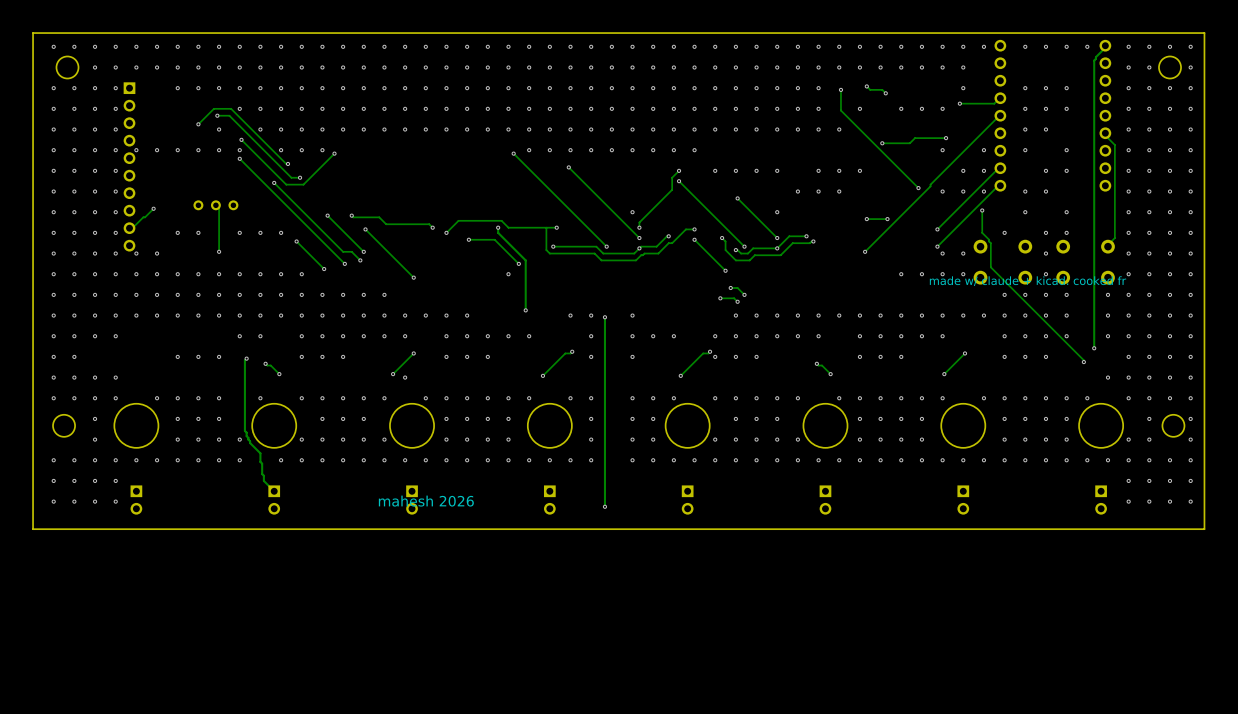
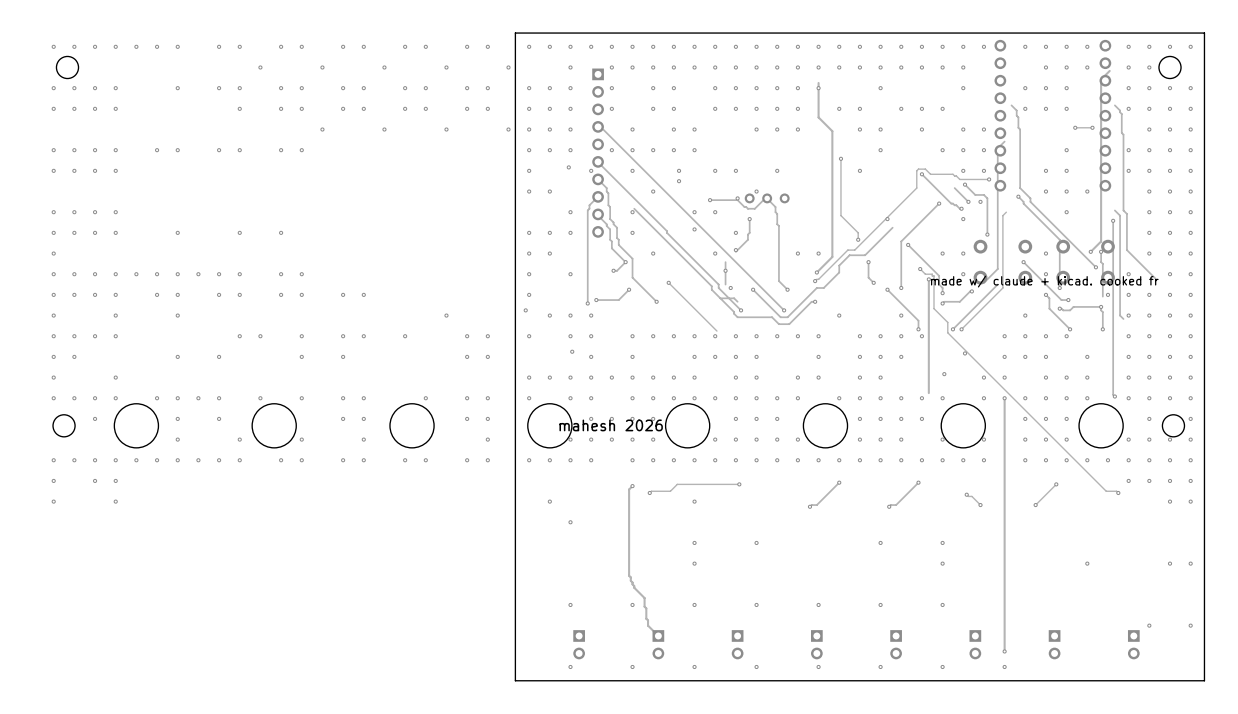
board edge: (515, 33) (33, 33) (33, 529) (1204, 529) -> (515, 33) (515, 680) (1204, 680) (1204, 529)
via: (198, 46) -> none
via: (260, 46) -> none
via: (322, 46) -> none
via: (384, 46) -> none
via: (446, 46) -> none
via: (508, 46) -> none
track: (1102, 50) (1094, 60) (1094, 348) -> none
via: (95, 67) -> none
via: (115, 67) -> none
via: (136, 67) -> none
via: (157, 67) -> none
via: (177, 67) -> none
via: (198, 67) -> none
via: (219, 67) -> none
via: (239, 67) -> none
via: (281, 67) -> none
via: (301, 67) -> none
via: (343, 67) -> none
via: (363, 67) -> none
via: (405, 67) -> none
via: (425, 67) -> none
via: (467, 67) -> none
via: (487, 67) -> none
via: (529, 67) -> none
via: (549, 67) -> none
via: (591, 67) -> none
via: none -> (1045, 67)
via: none -> (1066, 67)
via: none -> (1087, 67)
via: (1190, 67) -> none
track: none -> (1109, 70) (1101, 81) (1101, 241) (1090, 251)
track: none -> (818, 82) (818, 117) (832, 131) (832, 256) (816, 272)
track: (866, 86) (870, 89) (882, 89) (885, 93) -> none
via: (866, 86) -> none
via: (198, 88) -> none
via: (260, 88) -> none
via: (322, 88) -> none
via: (384, 88) -> none
via: (446, 88) -> none
via: (508, 88) -> none
via: (591, 88) -> none
via: (632, 88) -> none
via: (694, 88) -> none
via: none -> (880, 88)
track: (840, 89) (840, 110) (918, 188) -> none
via: (840, 89) -> none
via: (885, 93) -> none
track: (996, 101) (994, 103) (959, 103) -> none
via: (959, 103) -> none
track: none -> (1011, 105) (1016, 110) (1020, 129) (1020, 188) (1030, 198) (1030, 201) (1095, 267)
track: none -> (1114, 105) (1121, 114) (1123, 210) (1126, 213) (1126, 250) (1156, 279)
via: (260, 108) -> none
via: (322, 108) -> none
via: (384, 108) -> none
via: (446, 108) -> none
via: (508, 108) -> none
via: (591, 108) -> none
via: (632, 108) -> none
via: (694, 108) -> none
via: (818, 108) -> none
via: none -> (839, 108)
track: (217, 115) (229, 115) (291, 177) (300, 177) -> none
via: (217, 115) -> none
track: (996, 119) (865, 251) -> none
track: (198, 124) (213, 108) (231, 108) (287, 163) -> none
via: (198, 124) -> none
via: none -> (1075, 127)
track: none -> (1092, 127) (1075, 127)
via: none -> (1092, 127)
via: (53, 129) -> none
via: (74, 129) -> none
via: (95, 129) -> none
via: (115, 129) -> none
via: (219, 129) -> none
via: (260, 129) -> none
via: (281, 129) -> none
via: (301, 129) -> none
via: (343, 129) -> none
via: (363, 129) -> none
via: (405, 129) -> none
via: (425, 129) -> none
via: (467, 129) -> none
via: (487, 129) -> none
via: (591, 129) -> none
track: none -> (603, 129) (784, 310)
via: (611, 129) -> none
via: (653, 129) -> none
via: (715, 129) -> none
via: (735, 129) -> none
via: (818, 129) -> none
via: (839, 129) -> none
via: none -> (859, 129)
via: none -> (880, 129)
via: none -> (921, 129)
via: none -> (963, 129)
via: none -> (983, 129)
via: (1025, 129) -> none
via: (1045, 129) -> none
via: (1128, 129) -> none
track: (946, 138) (915, 138) (909, 143) (882, 143) -> none
via: (946, 138) -> none
track: (1107, 138) (1114, 145) (1114, 238) (1111, 241) -> none
track: (241, 139) (286, 184) (303, 184) (334, 153) -> none
via: (241, 139) -> none
track: none -> (1004, 141) (997, 148) (997, 269) (983, 282)
via: (882, 143) -> none
via: (136, 150) -> none
via: (198, 150) -> none
via: (322, 150) -> none
via: (591, 150) -> none
via: none -> (880, 150)
via: none -> (963, 150)
via: (1025, 150) -> none
via: (334, 153) -> none
track: (513, 153) (606, 246) -> none
via: (513, 153) -> none
part: none -> (598, 153)
track: (239, 158) (344, 263) -> none
via: (239, 158) -> none
track: none -> (840, 158) (840, 215) (858, 232) (858, 239)
via: (287, 163) -> none
track: none -> (601, 165) (718, 284) (718, 287) (741, 310)
part: (129, 166) -> none
track: (568, 167) (639, 238) -> none
via: none -> (529, 170)
via: none -> (591, 170)
via: none -> (632, 170)
track: (679, 170) (672, 177) (672, 189) (639, 222) (639, 227) -> none
via: (756, 170) -> none
via: (818, 170) -> none
via position: (839, 170) -> (840, 158)
track: (996, 170) (937, 229) -> none
track: none -> (921, 174) (951, 203) (961, 208)
via: none -> (921, 174)
via: (300, 177) -> none
track: none -> (989, 179) (959, 179) (952, 174) (930, 174) (925, 169) (918, 169) (916, 170) (916, 188) (854, 250) (847, 250) (815, 281)
via: none -> (989, 179)
track: (679, 181) (744, 246) -> none
track: (274, 182) (343, 251) (351, 251) (360, 260) -> none
via: (274, 182) -> none
track: none -> (601, 182) (608, 193) (610, 219) (617, 227) (618, 244) (632, 258) (632, 277) (656, 301)
track: none -> (965, 184) (975, 194) (983, 194) (987, 198) (987, 234)
via: none -> (965, 184)
via: (918, 188) -> none
track: none -> (954, 188) (968, 201)
track: (996, 188) (937, 246) -> none
via: (53, 191) -> none
via: (74, 191) -> none
via: (95, 191) -> none
via: (115, 191) -> none
via: none -> (529, 191)
via: none -> (549, 191)
via: none -> (653, 191)
via: none -> (756, 191)
via: (797, 191) -> none
via: (818, 191) -> none
via: (839, 191) -> none
via: (942, 191) -> none
via: (963, 191) -> none
via: (983, 191) -> none
via: (1025, 191) -> none
via: none -> (1066, 191)
via: none -> (1087, 191)
via: (1128, 191) -> none
track: none -> (1018, 196) (1059, 239) (1059, 287)
via: none -> (1018, 196)
track: (737, 198) (746, 207) -> (710, 200) (737, 200) (746, 207)
part: none -> (767, 198)
track: none -> (594, 200) (587, 210) (587, 303)
via: none -> (710, 200)
track: none -> (770, 201) (775, 207) (778, 225) (778, 281) (787, 289)
via: none -> (968, 201)
via: none -> (980, 201)
track: none -> (939, 203) (901, 241) (901, 287)
via: none -> (939, 203)
part: (215, 205) -> none
track: (153, 208) (134, 225) -> none
via: (153, 208) -> none
track: (219, 208) (219, 251) -> none
track: none -> (634, 208) (711, 286) (711, 289) (737, 317) (772, 317) (778, 324) (789, 324) (811, 301) (815, 301)
track: (747, 208) (777, 238) -> (747, 208) (754, 208) (763, 200)
via: none -> (961, 208)
track: (982, 210) (982, 232) (990, 243) (990, 267) (1083, 362) -> none
via: (982, 210) -> none
track: none -> (1114, 210) (1120, 215) (1120, 315) (1123, 319)
via: none -> (570, 212)
via: none -> (694, 212)
via: none -> (715, 212)
via: (777, 212) -> none
track: none -> (1006, 212) (1002, 215) (1002, 287) (961, 329)
via: (1025, 212) -> none
via: (1128, 212) -> none
track: (327, 215) (363, 251) -> none
via: (327, 215) -> none
track: (351, 215) (353, 217) (379, 217) (386, 224) (429, 224) (432, 227) -> none
via: (351, 215) -> none
track: none -> (601, 219) (610, 229) (611, 248) (625, 262) (617, 270) (613, 270)
track: none -> (749, 219) (747, 239) (735, 251)
via: none -> (749, 219)
via: (866, 219) -> none
track: (887, 219) (866, 219) -> none
via: none -> (963, 219)
track: none -> (1113, 220) (1113, 394) (1114, 396)
via: none -> (1113, 220)
via: (432, 227) -> none
track: (498, 227) (498, 232) (525, 260) (525, 310) -> none
via: (498, 227) -> none
track: (546, 227) (546, 250) (549, 253) (594, 253) (601, 260) (635, 260) (644, 253) (658, 253) (685, 229) (694, 229) -> none
track: (556, 227) (508, 227) (501, 220) (458, 220) (446, 232) -> none
via: (556, 227) -> none
via: (639, 227) -> none
track: none -> (892, 227) (865, 255) (849, 255) (839, 265) (839, 272) (823, 287) (816, 287) (787, 317) (780, 317) (753, 289)
track: (365, 229) (413, 277) -> none
via: (365, 229) -> none
via: (937, 229) -> none
via: (198, 232) -> none
via: (260, 232) -> none
via: (446, 232) -> none
via: none -> (529, 232)
via: none -> (549, 232)
via: none -> (570, 232)
via: none -> (632, 232)
via: none -> (735, 232)
via: (1004, 232) -> none
via: (1045, 232) -> none
via: (1066, 232) -> none
via: (1128, 232) -> none
via: none -> (987, 234)
track: (668, 236) (656, 246) (641, 246) (634, 253) (603, 253) (596, 246) (553, 246) -> none
via: (668, 236) -> none
track: (806, 236) (789, 236) (777, 248) (753, 248) (747, 253) (741, 253) (735, 250) -> none
via: (806, 236) -> none
via: (639, 238) -> none
track: (722, 238) (725, 241) (725, 250) (735, 260) (749, 260) (754, 255) (780, 255) (792, 243) (813, 241) -> none
via: (722, 238) -> none
via: (777, 238) -> none
track: (468, 239) (494, 239) (518, 263) -> none
via: (468, 239) -> none
track: (694, 239) (725, 270) -> none
via: (694, 239) -> none
via: none -> (858, 239)
track: (296, 241) (324, 269) -> none
via: (296, 241) -> none
via: (813, 241) -> none
track: none -> (908, 244) (939, 275) (939, 284) (942, 287) (942, 293)
via: none -> (908, 244)
via: (553, 246) -> none
via: (606, 246) -> none
via: (744, 246) -> none
via: (937, 246) -> none
via: (639, 248) -> none
via: (777, 248) -> none
via: (219, 251) -> none
via: (363, 251) -> none
via: (865, 251) -> none
via: none -> (1090, 251)
track: none -> (1101, 251) (1102, 296)
via: none -> (1101, 251)
via: (74, 253) -> none
via: (95, 253) -> none
via: (115, 253) -> none
via: (136, 253) -> none
via: (157, 253) -> none
via: none -> (529, 253)
via: none -> (549, 253)
via: none -> (653, 253)
via: none -> (715, 253)
via: none -> (797, 253)
via: none -> (818, 253)
via: (1128, 253) -> none
via: (360, 260) -> none
via: none -> (625, 262)
track: none -> (725, 262) (725, 284)
track: none -> (868, 262) (868, 277) (873, 282)
via: none -> (868, 262)
track: none -> (1023, 262) (1061, 300) (1068, 300)
via: none -> (1023, 262)
via: (344, 263) -> none
via: (518, 263) -> none
via: none -> (1095, 267)
via: (324, 269) -> none
track: none -> (920, 269) (925, 274) (934, 275) (934, 308) (947, 322) (947, 332) (1106, 491) (1118, 492)
via: none -> (920, 269)
via: none -> (613, 270)
via: none -> (816, 272)
via: (260, 274) -> none
via: (508, 274) -> none
via: none -> (529, 274)
via: none -> (570, 274)
via: (901, 274) -> none
via: (921, 274) -> none
via: (942, 274) -> none
via: (1149, 274) -> none
via: (413, 277) -> none
track: none -> (928, 279) (928, 393)
via: none -> (928, 279)
via: none -> (815, 281)
track: none -> (668, 282) (716, 331)
via: none -> (668, 282)
via: none -> (873, 282)
track: none -> (997, 284) (952, 329)
track: (730, 287) (737, 287) (744, 294) -> none
via: none -> (901, 287)
via: none -> (1059, 287)
track: none -> (629, 289) (618, 300) (596, 300)
via: none -> (629, 289)
via: none -> (753, 289)
via: none -> (787, 289)
track: none -> (887, 289) (918, 320) (918, 329)
via: none -> (887, 289)
track: none -> (971, 291) (959, 301) (944, 301) (942, 303)
via: none -> (971, 291)
via: none -> (942, 293)
via: (136, 294) -> none
via: (198, 294) -> none
via: (260, 294) -> none
via: (322, 294) -> none
via: (384, 294) -> none
via: none -> (529, 294)
via: (744, 294) -> none
via: (1004, 294) -> none
via: (1025, 294) -> none
track: none -> (1045, 294) (1049, 298) (1049, 308) (1070, 329)
via: (1066, 294) -> none
via: (720, 298) -> none
via: none -> (596, 300)
via: none -> (1068, 300)
via: none -> (656, 301)
via: (737, 301) -> none
via: none -> (815, 301)
via: none -> (587, 303)
via: none -> (942, 303)
via: none -> (1101, 306)
track: none -> (1059, 308) (1070, 310) (1073, 306) (1101, 306) (1102, 329)
via: none -> (1059, 308)
via: none -> (741, 310)
via: none -> (784, 310)
via: (74, 315) -> none
via: (95, 315) -> none
via: (136, 315) -> none
via: (157, 315) -> none
via: (198, 315) -> none
via: (219, 315) -> none
via: (239, 315) -> none
via: (260, 315) -> none
via: (281, 315) -> none
via: (301, 315) -> none
via: (322, 315) -> none
via: (343, 315) -> none
via: (363, 315) -> none
via: (384, 315) -> none
via: (405, 315) -> none
via: (425, 315) -> none
via: (467, 315) -> none
via: none -> (549, 315)
via: (632, 315) -> none
via: (735, 315) -> none
via: (756, 315) -> none
via: (777, 315) -> none
via: (797, 315) -> none
via: (818, 315) -> none
via: (859, 315) -> none
via: (880, 315) -> none
via: (921, 315) -> none
via: (942, 315) -> none
via: (963, 315) -> none
via: (983, 315) -> none
via: (1004, 315) -> none
via: (1045, 315) -> none
via: (1066, 315) -> none
via: (1107, 315) -> none
track: (604, 317) (604, 506) -> none
via: (604, 317) -> none
via: none -> (918, 329)
via: none -> (952, 329)
via: none -> (961, 329)
via: none -> (1070, 329)
via: none -> (1102, 329)
via: (322, 336) -> none
via: (384, 336) -> none
via: (446, 336) -> none
via: (508, 336) -> none
via: none -> (570, 336)
via: none -> (694, 336)
via: (942, 336) -> none
via: (1107, 336) -> none
via: (1094, 348) -> none
track: (572, 351) (565, 353) (542, 375) -> none
track: (710, 351) (703, 353) (680, 375) -> none
via: (710, 351) -> none
track: (413, 353) (393, 374) -> none
via: (413, 353) -> none
track: (965, 353) (944, 374) -> (1056, 484) (1035, 505)
via: (198, 356) -> none
via: (322, 356) -> none
via: (446, 356) -> none
via: none -> (694, 356)
via: none -> (818, 356)
via: none -> (1087, 356)
track: (246, 358) (244, 360) (244, 430) (250, 443) (260, 453) (263, 480) (269, 486) -> none
via: (246, 358) -> none
via: (1083, 362) -> none
track: (265, 363) (270, 365) (279, 374) -> none
via: (265, 363) -> none
track: (816, 363) (822, 365) (830, 374) -> none
via: (816, 363) -> none
via: (279, 374) -> none
via: (393, 374) -> none
via: (830, 374) -> none
via: (542, 375) -> none
via: (680, 375) -> none
via: (74, 377) -> none
via: (95, 377) -> none
via: (405, 377) -> none
via: none -> (529, 377)
via: none -> (549, 377)
via: none -> (570, 377)
via: none -> (591, 377)
via: none -> (611, 377)
via: none -> (632, 377)
via: none -> (653, 377)
via: none -> (673, 377)
via: none -> (694, 377)
via: none -> (735, 377)
via: none -> (756, 377)
via: none -> (797, 377)
via: none -> (818, 377)
via: none -> (859, 377)
via: none -> (880, 377)
via: none -> (983, 377)
via: none -> (1004, 377)
via: none -> (1045, 377)
via: none -> (1066, 377)
via: none -> (1087, 377)
via: (1107, 377) -> none
via: none -> (1114, 396)
via: (322, 398) -> none
via: (384, 398) -> none
via: (446, 398) -> none
via: (508, 398) -> none
via: none -> (694, 398)
track: none -> (1004, 399) (1004, 651)
via: (198, 418) -> none
via: (322, 418) -> none
via: (446, 418) -> none
via: (508, 418) -> none
via: none -> (611, 418)
via: (1004, 418) -> none
text: none -> mahesh 2026 (611, 425)
via: (95, 439) -> none
via: (198, 439) -> none
via: (219, 439) -> none
via: (322, 439) -> none
via: (343, 439) -> none
via: (384, 439) -> none
via: (446, 439) -> none
via: (467, 439) -> none
via: (508, 439) -> none
via: none -> (570, 439)
via: none -> (611, 439)
via position: (921, 439) -> (942, 439)
via: none -> (983, 439)
via: (1004, 439) -> none
via: none -> (1170, 439)
via: (322, 460) -> none
via: (384, 460) -> none
via: (446, 460) -> none
via: (508, 460) -> none
via: (1004, 460) -> none
via: (74, 480) -> none
track: none -> (839, 482) (816, 505) (809, 506)
via: none -> (839, 482)
track: none -> (918, 482) (896, 505) (889, 506)
via: none -> (918, 482)
track: none -> (739, 484) (677, 484) (670, 491) (651, 491) (649, 492)
via: none -> (739, 484)
via: none -> (1056, 484)
track: none -> (632, 486) (629, 489) (629, 575) (634, 587) (644, 598) (648, 625) (653, 630)
via: none -> (632, 486)
via: none -> (649, 492)
track: none -> (966, 494) (971, 496) (980, 505)
via: none -> (966, 494)
part: (136, 500) -> none
part: (274, 500) -> none
part: (412, 500) -> none
part: (549, 500) -> none
part: (687, 500) -> none
part: (825, 500) -> none
part: (963, 500) -> none
part: (1101, 500) -> none
via: (74, 501) -> none
via: (95, 501) -> none
text: mahesh 2026 (426, 501) -> none
via: none -> (549, 501)
via: none -> (694, 501)
via position: (1128, 501) -> (1118, 492)
via: (1149, 501) -> none
via: none -> (980, 505)
via: none -> (1035, 505)
via: (604, 506) -> none
via: none -> (809, 506)
via: none -> (889, 506)
via: none -> (570, 522)
via: none -> (694, 542)
via: none -> (756, 542)
via: none -> (880, 542)
via: none -> (942, 542)
via: none -> (694, 563)
via: none -> (942, 563)
via: none -> (1087, 563)
via: none -> (1170, 563)
via: none -> (1190, 563)
via: none -> (570, 604)
via: none -> (632, 604)
via: none -> (694, 604)
via: none -> (756, 604)
via: none -> (818, 604)
via: none -> (880, 604)
via: none -> (942, 604)
via: none -> (1149, 625)
via: none -> (1190, 625)
part: none -> (579, 644)
part: none -> (658, 644)
part: none -> (737, 644)
part: none -> (816, 644)
part: none -> (896, 644)
part: none -> (975, 644)
part: none -> (1054, 644)
part: none -> (1133, 644)
via: none -> (1004, 651)
via: none -> (570, 666)
via: none -> (632, 666)
via: none -> (694, 666)
via: none -> (756, 666)
via: none -> (818, 666)
via: none -> (880, 666)
via: none -> (942, 666)
via: none -> (1004, 666)

